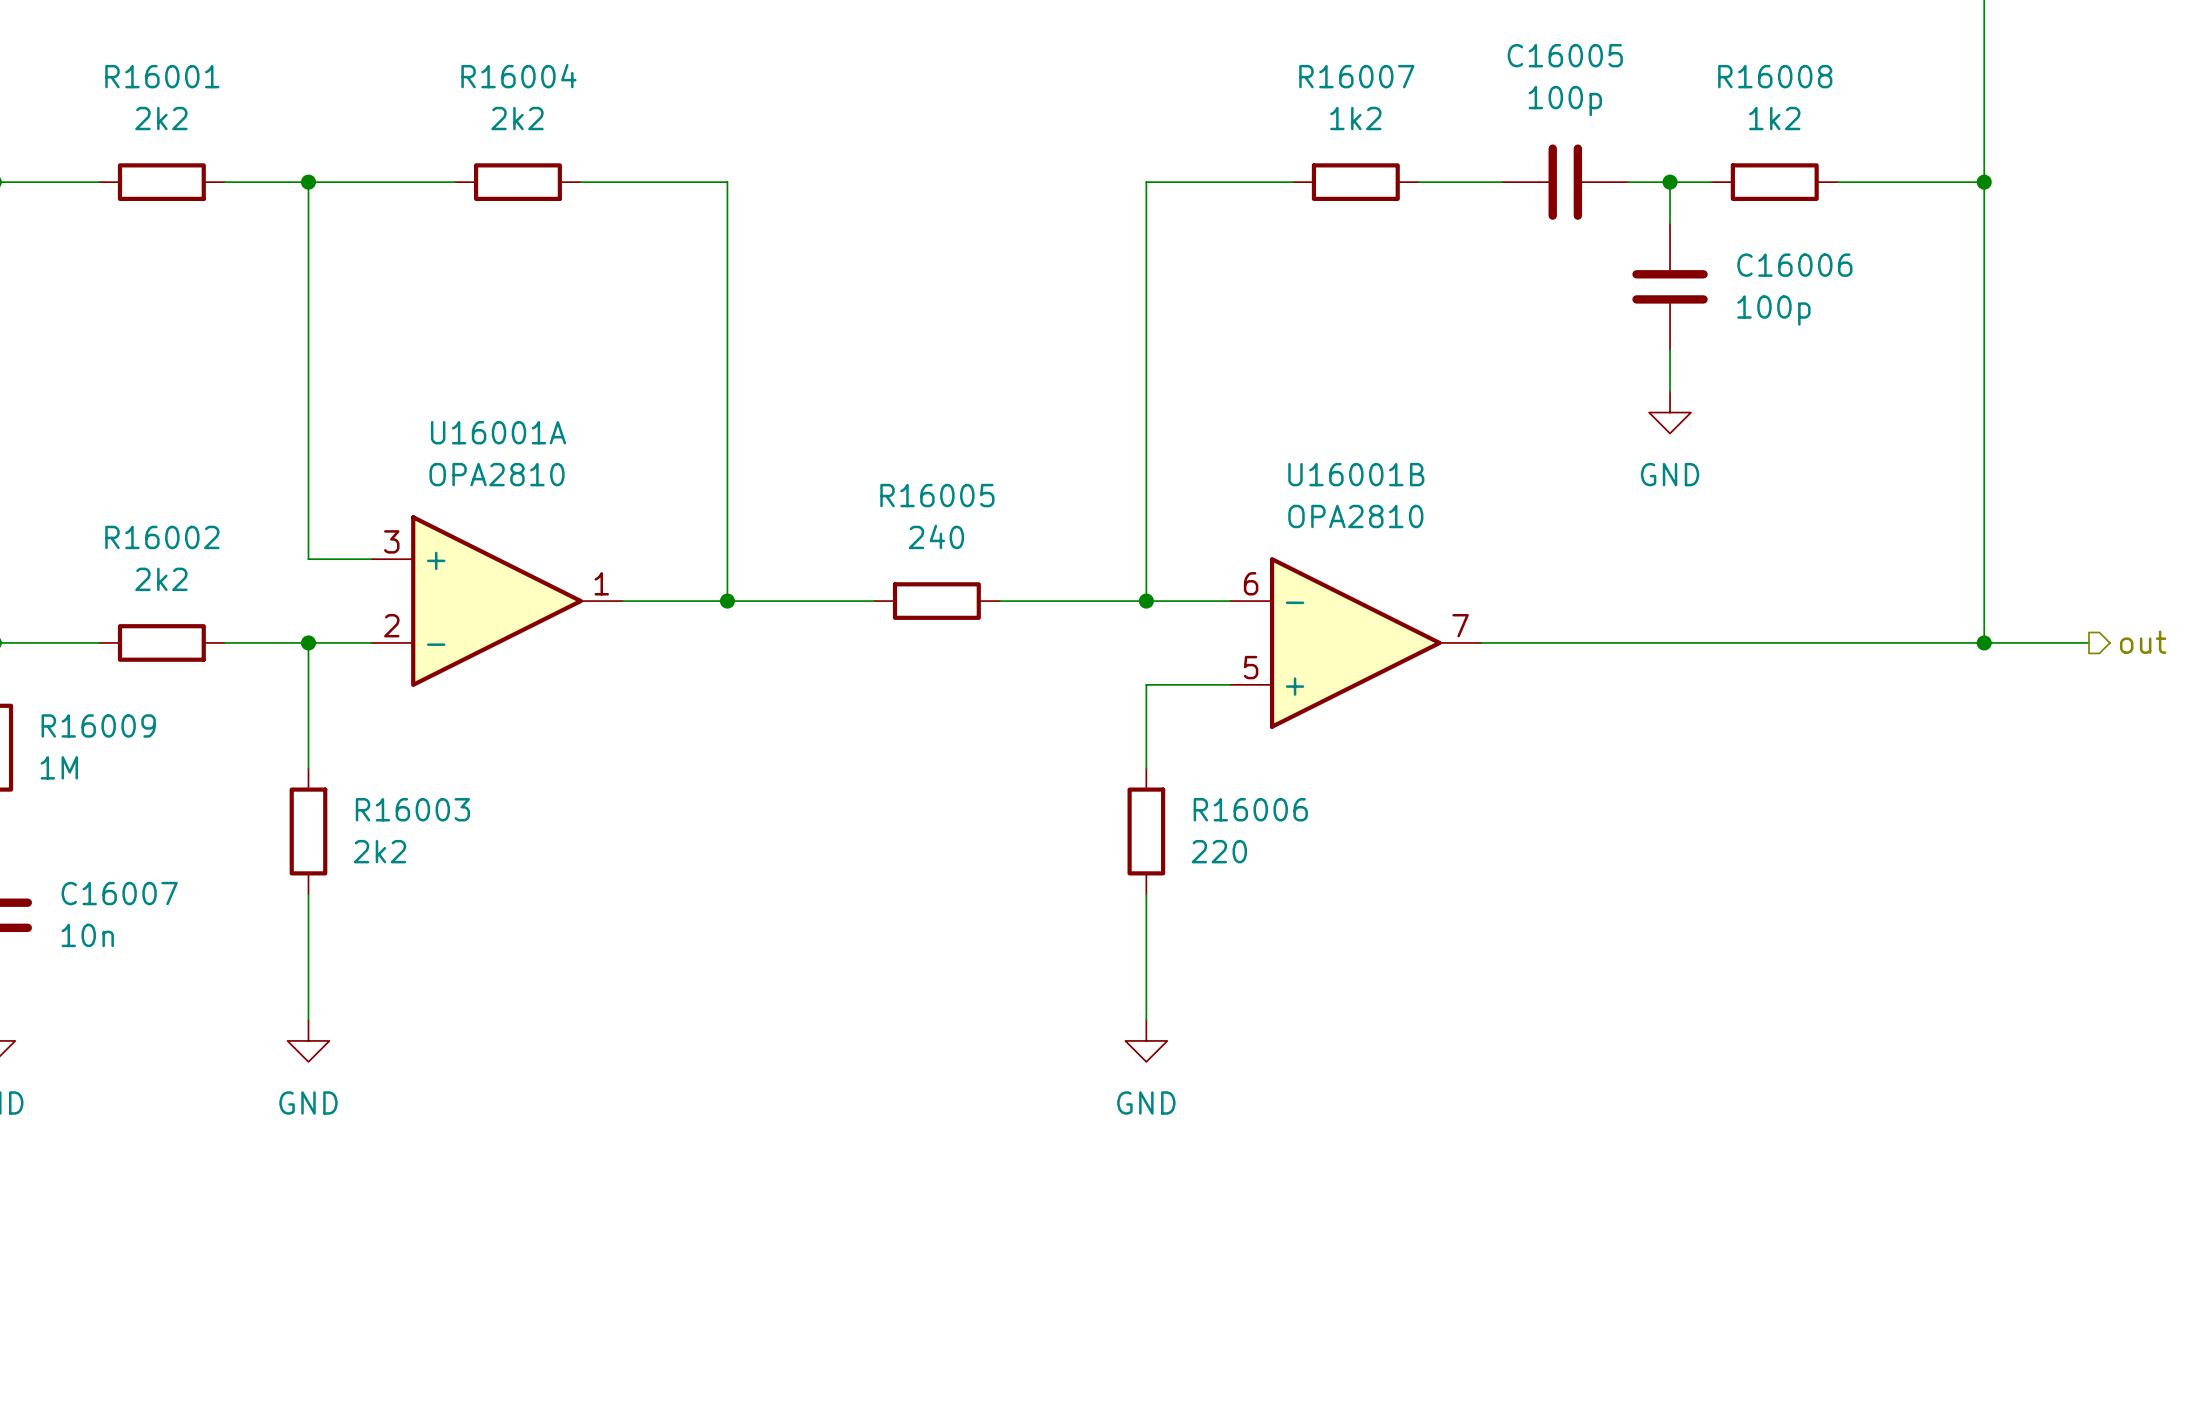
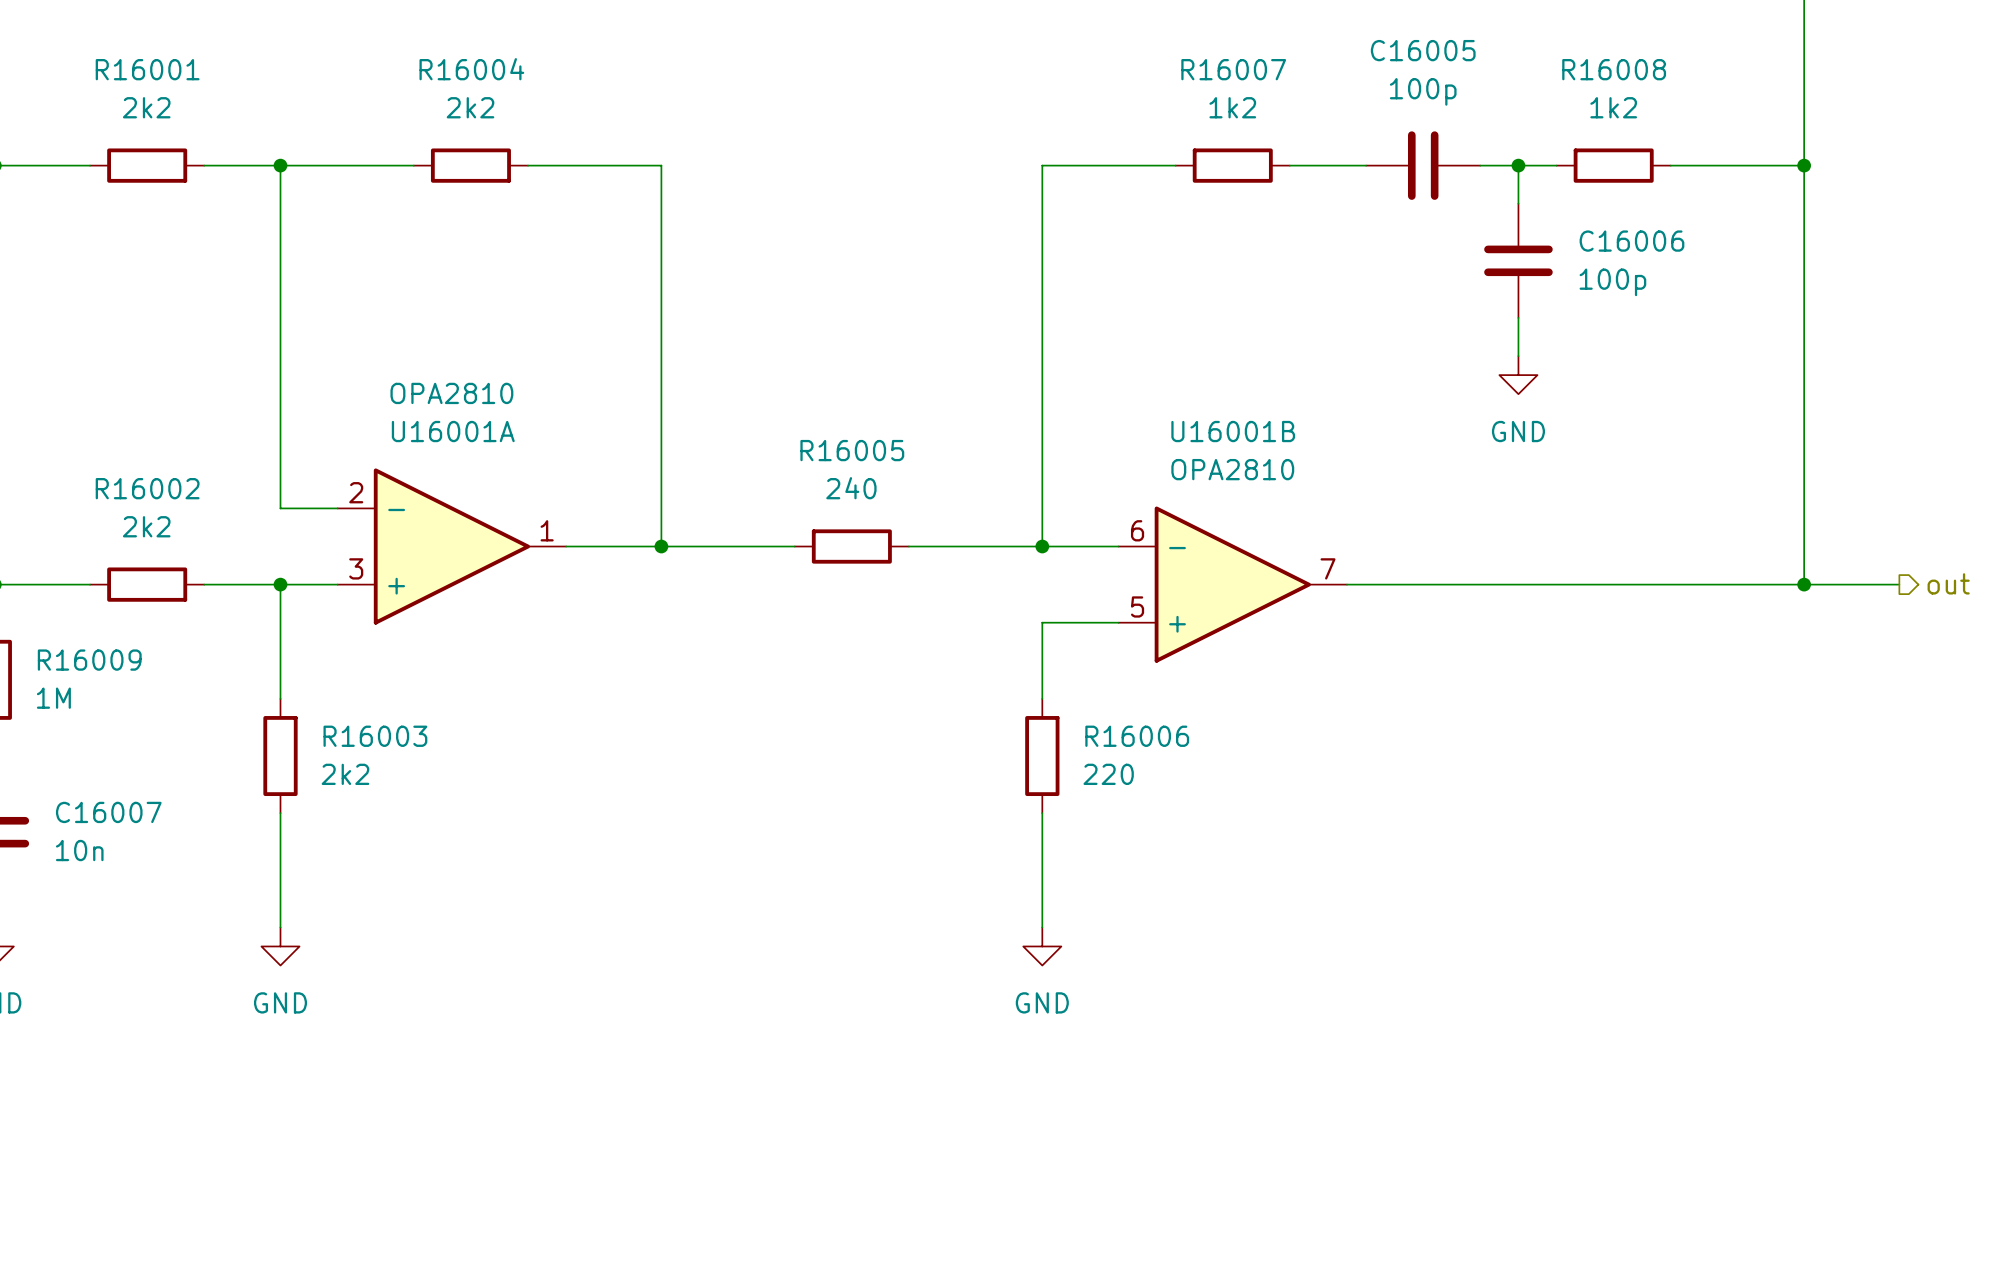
U16001A name position: U16001A (498, 432) -> U16001A (453, 431)
U16001A value position: OPA2810 (497, 474) -> OPA2810 (451, 393)
U16001A flip: as is (497, 601) -> up-down (451, 546)

